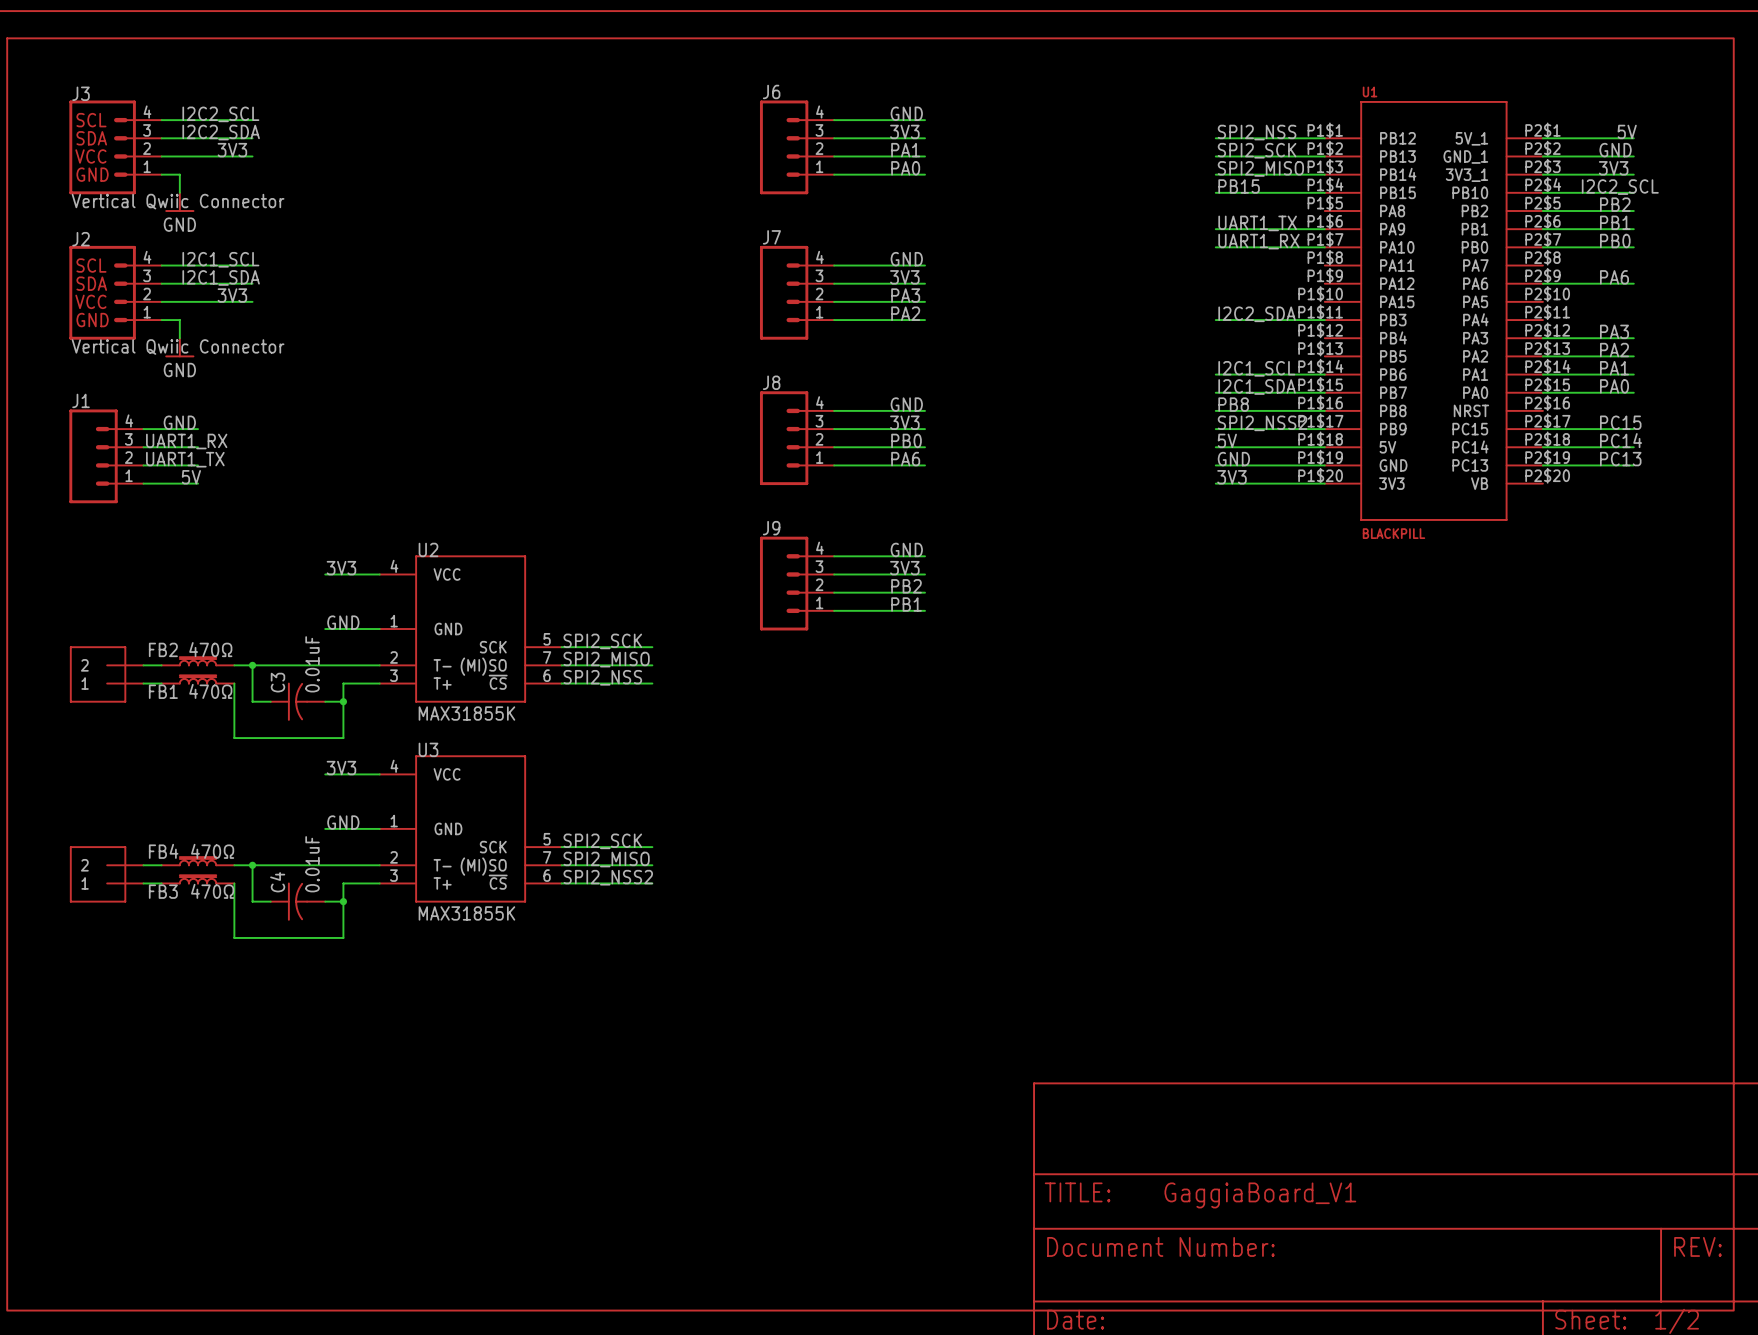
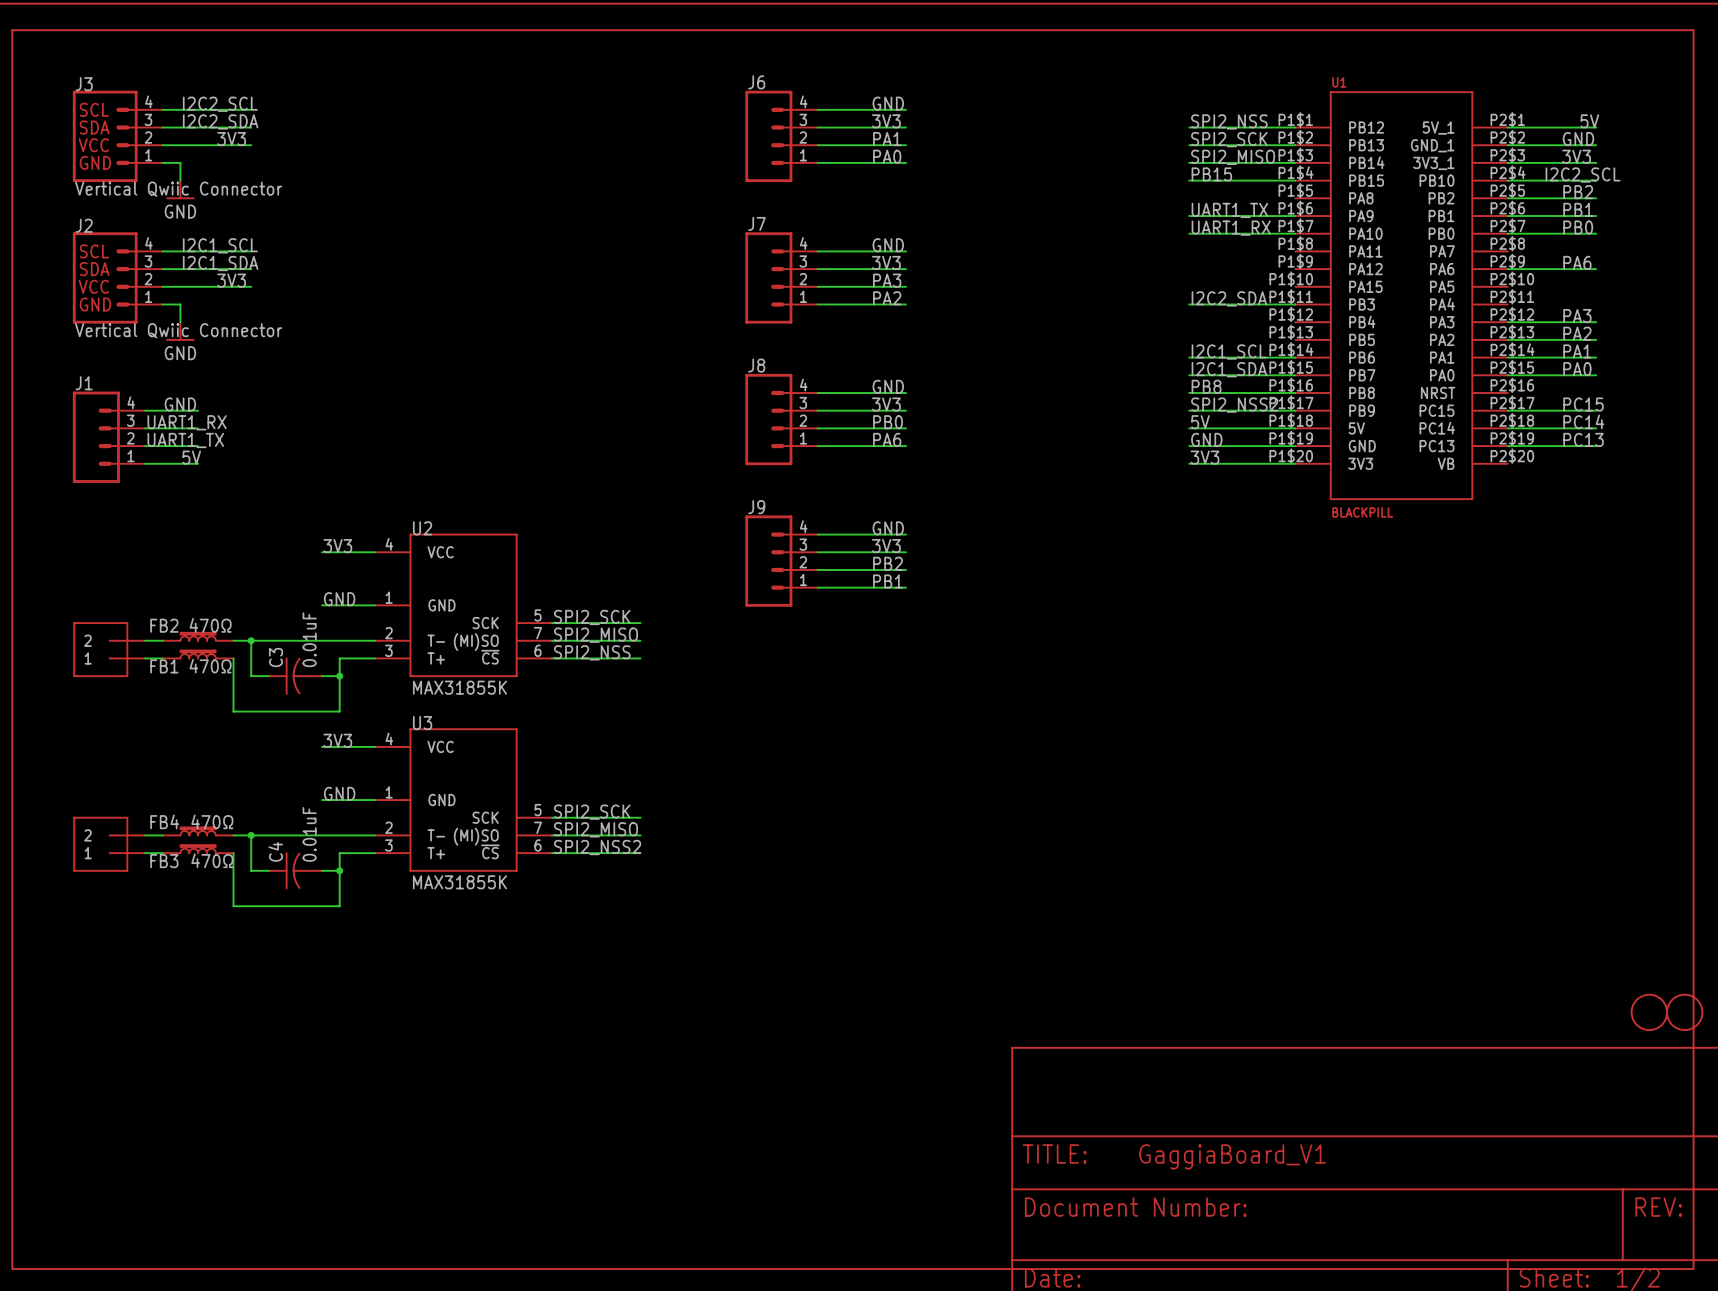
part: none -> (1649, 1012)
part: none -> (1684, 1012)

